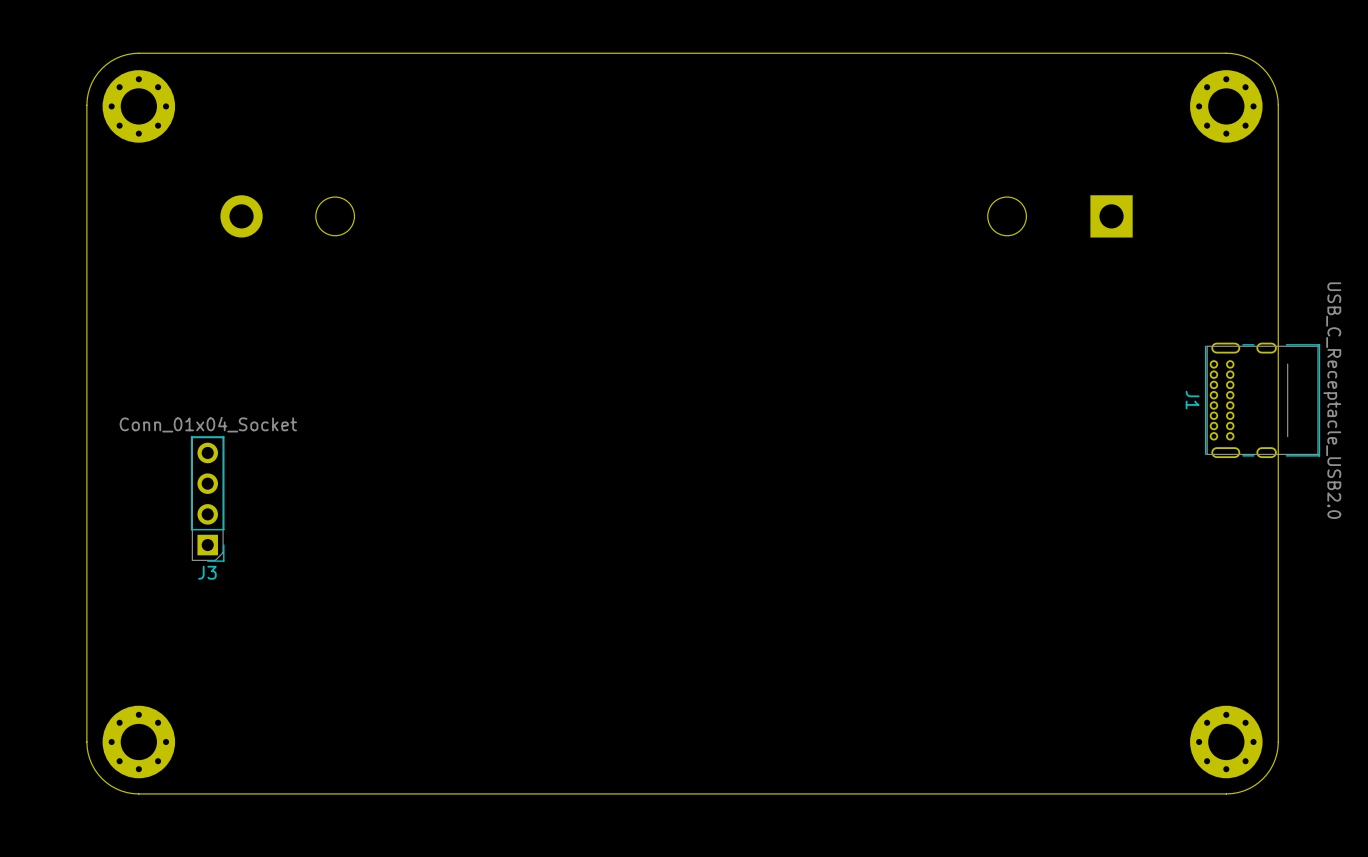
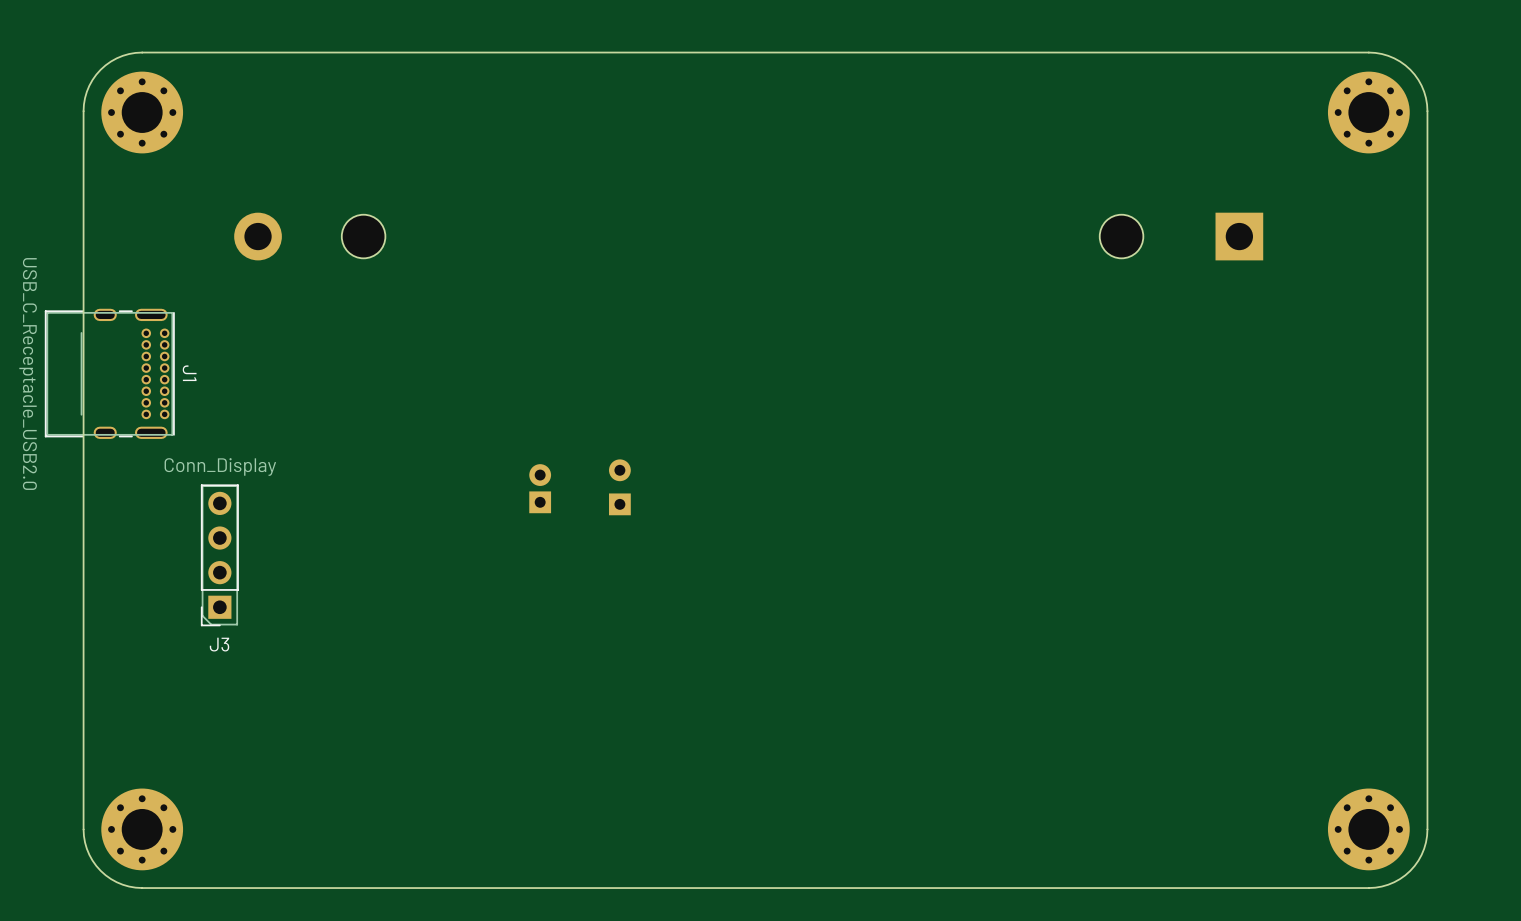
J1 rotation: 0° (1262, 400) -> 180° (109, 373)
J1 position: (1262, 400) -> (109, 373)
J3 value: Conn_01x04_Socket (208, 424) -> Conn_Display (220, 466)
J3 footprint: [190, 436, 225, 562] -> [200, 484, 239, 627]
part: none -> (619, 487)
part: none -> (540, 488)

